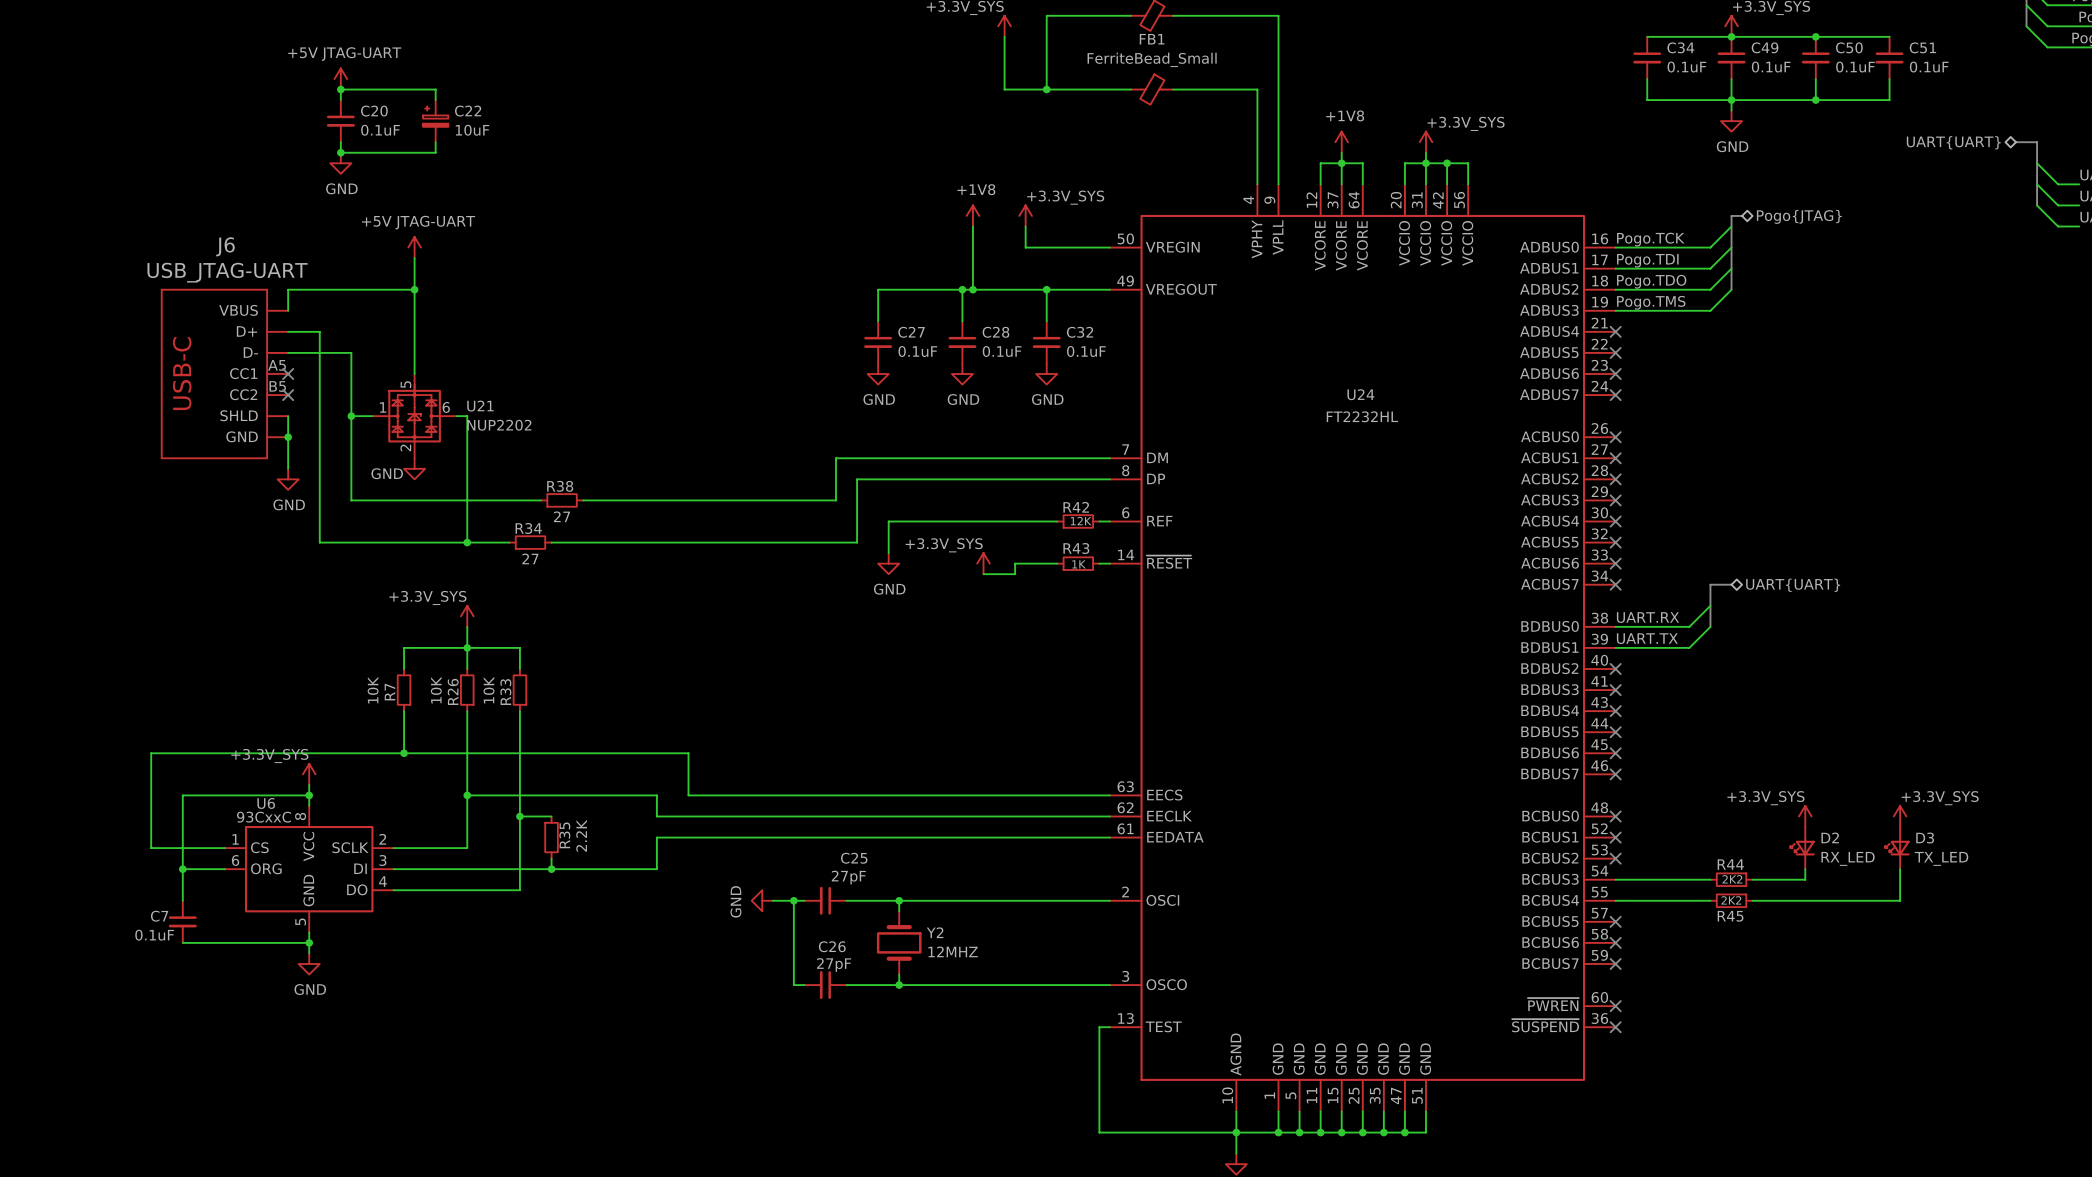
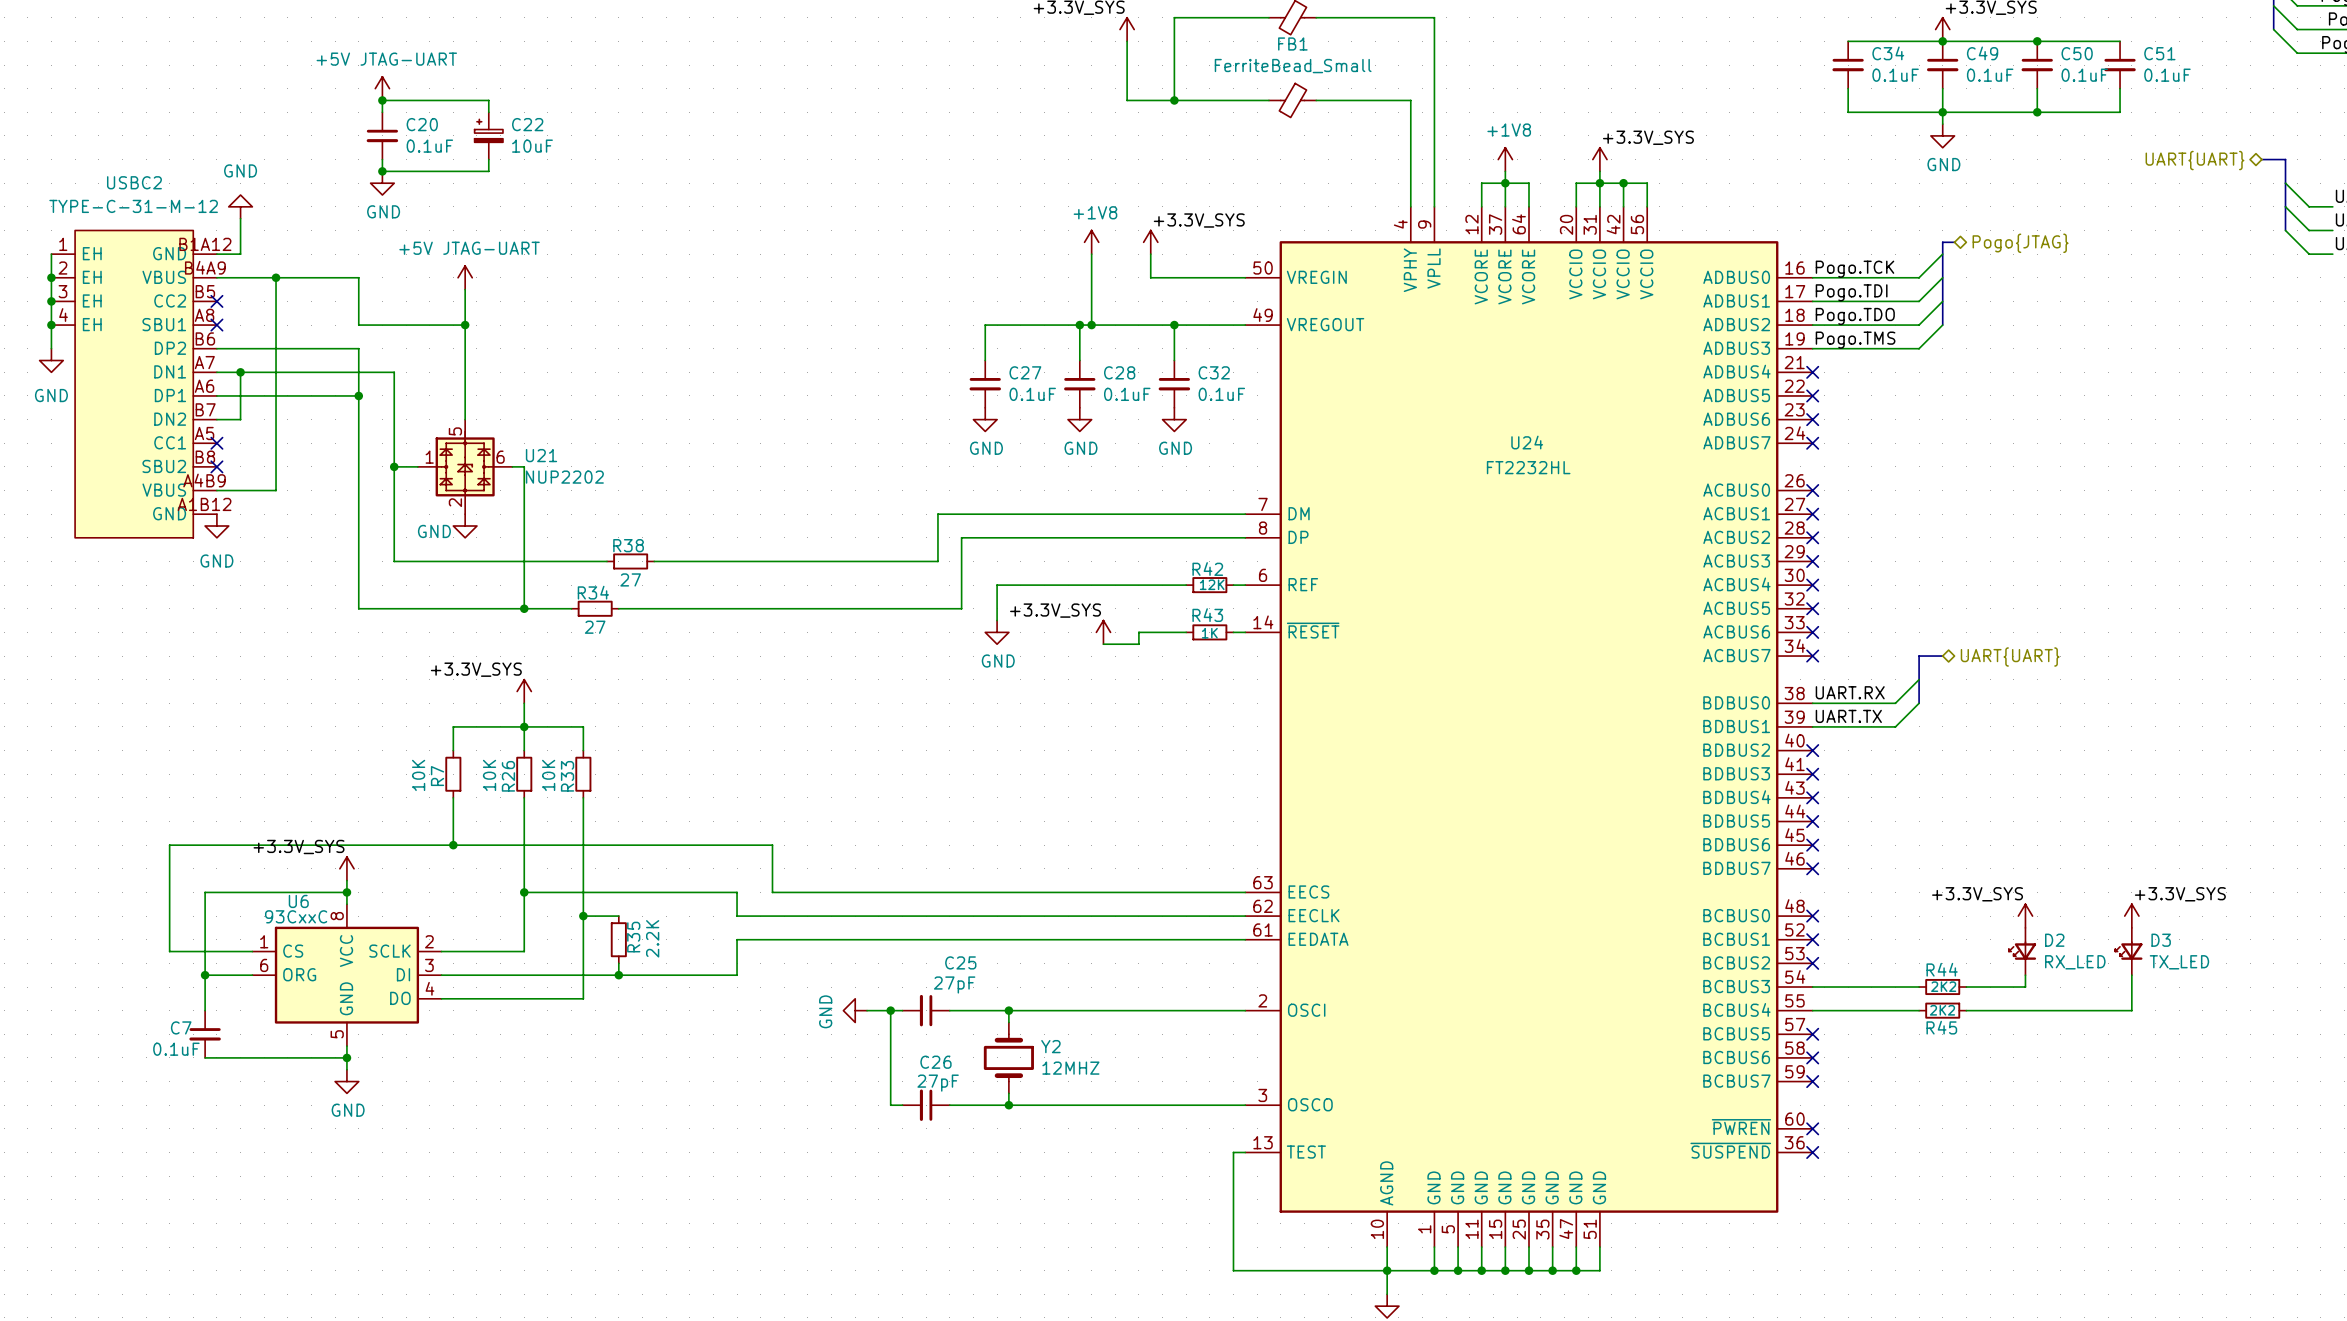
power symbol: none -> GND (240, 206)
wire: none -> (240, 218) (240, 254) (216, 254)
wire: none -> (51, 254) (51, 348)
junction: none -> (51, 277)
wire: none -> (276, 277) (276, 490) (216, 490)
junction: none -> (276, 277)
junction: none -> (51, 301)
no-connect mark: none -> (216, 301)
junction: none -> (51, 325)
no-connect mark: none -> (216, 325)
wire: (319, 289) (288, 289) (288, 310) -> (358, 325) (358, 277) (216, 277)
power symbol: none -> GND (51, 360)
wire: none -> (216, 372) (323, 372)
wire: none -> (240, 372) (240, 419) (216, 419)
junction: none -> (240, 372)
USBC2: none -> TYPE-C-31-M-12 (134, 384)
wire: none -> (216, 395) (323, 395)
wire: (319, 352) (351, 352) -> (216, 348) (358, 348) (358, 372) (394, 372) (394, 395)
junction: none -> (358, 395)
J6: USB_JTAG-UART (224, 374) -> none
no-connect mark: (288, 374) -> none
no-connect mark: none -> (216, 443)
no-connect mark: (288, 395) -> none
no-connect mark: none -> (216, 466)
wire: (288, 416) (288, 468) -> none
junction: (288, 437) -> none
power symbol position: GND (288, 479) -> GND (216, 526)
power symbol text position: GND (289, 504) -> GND (216, 561)

